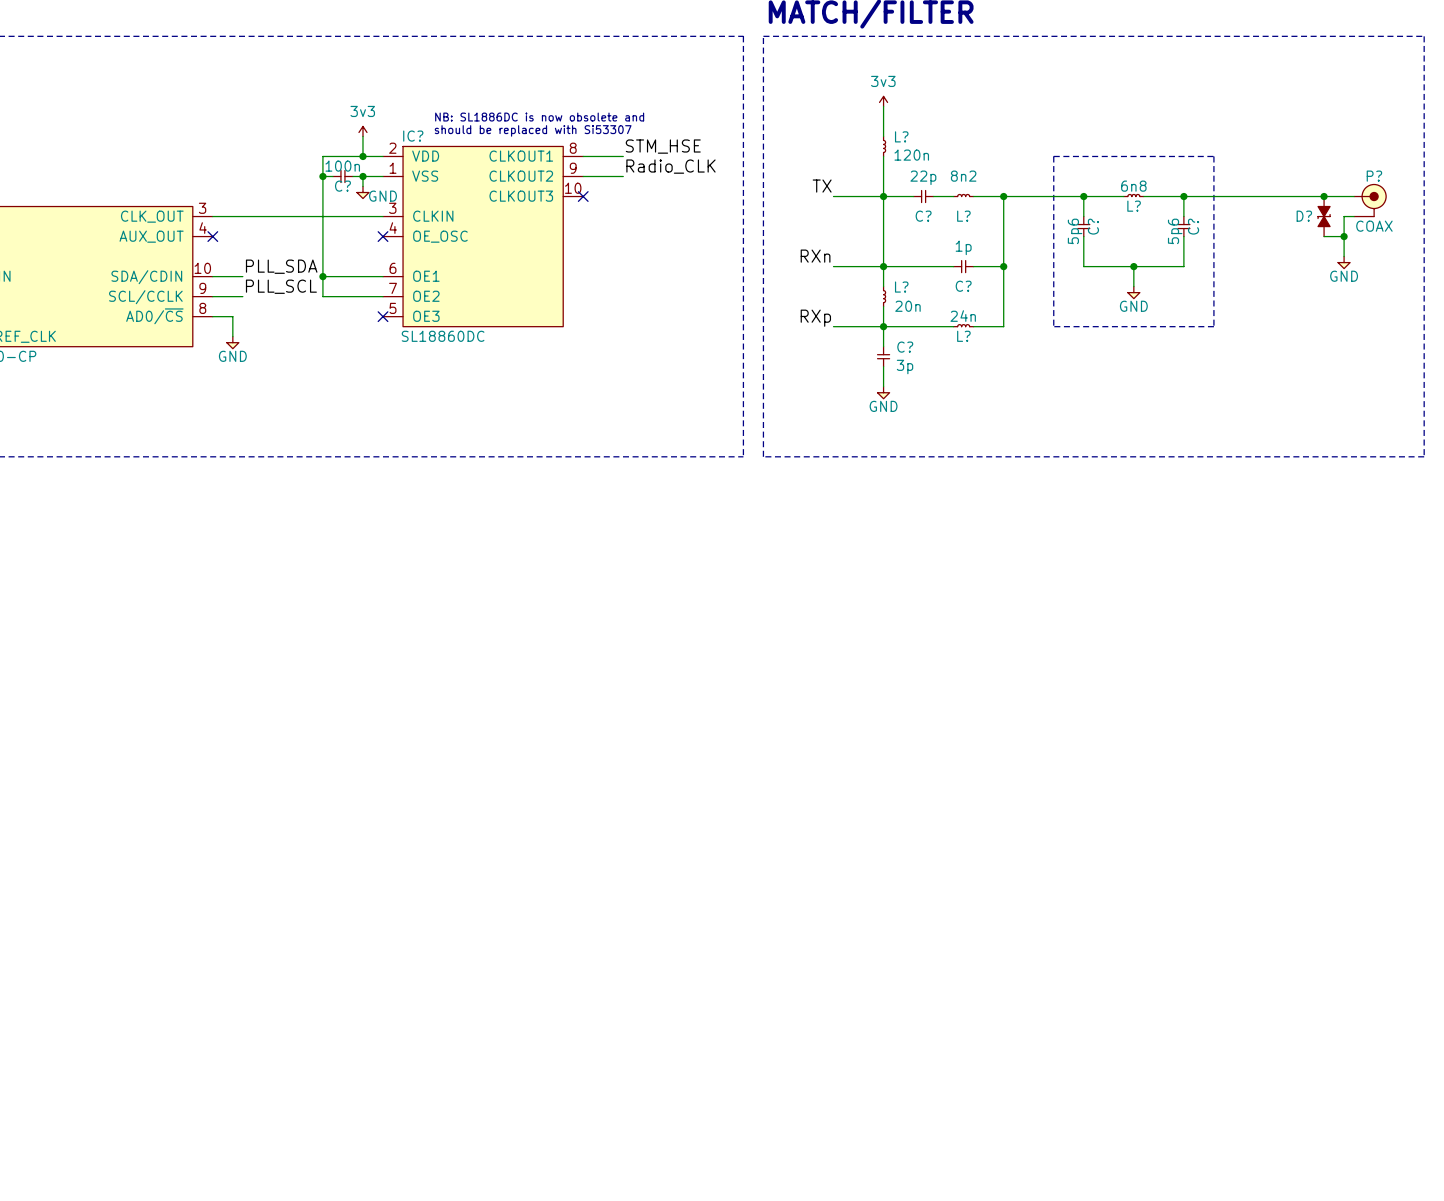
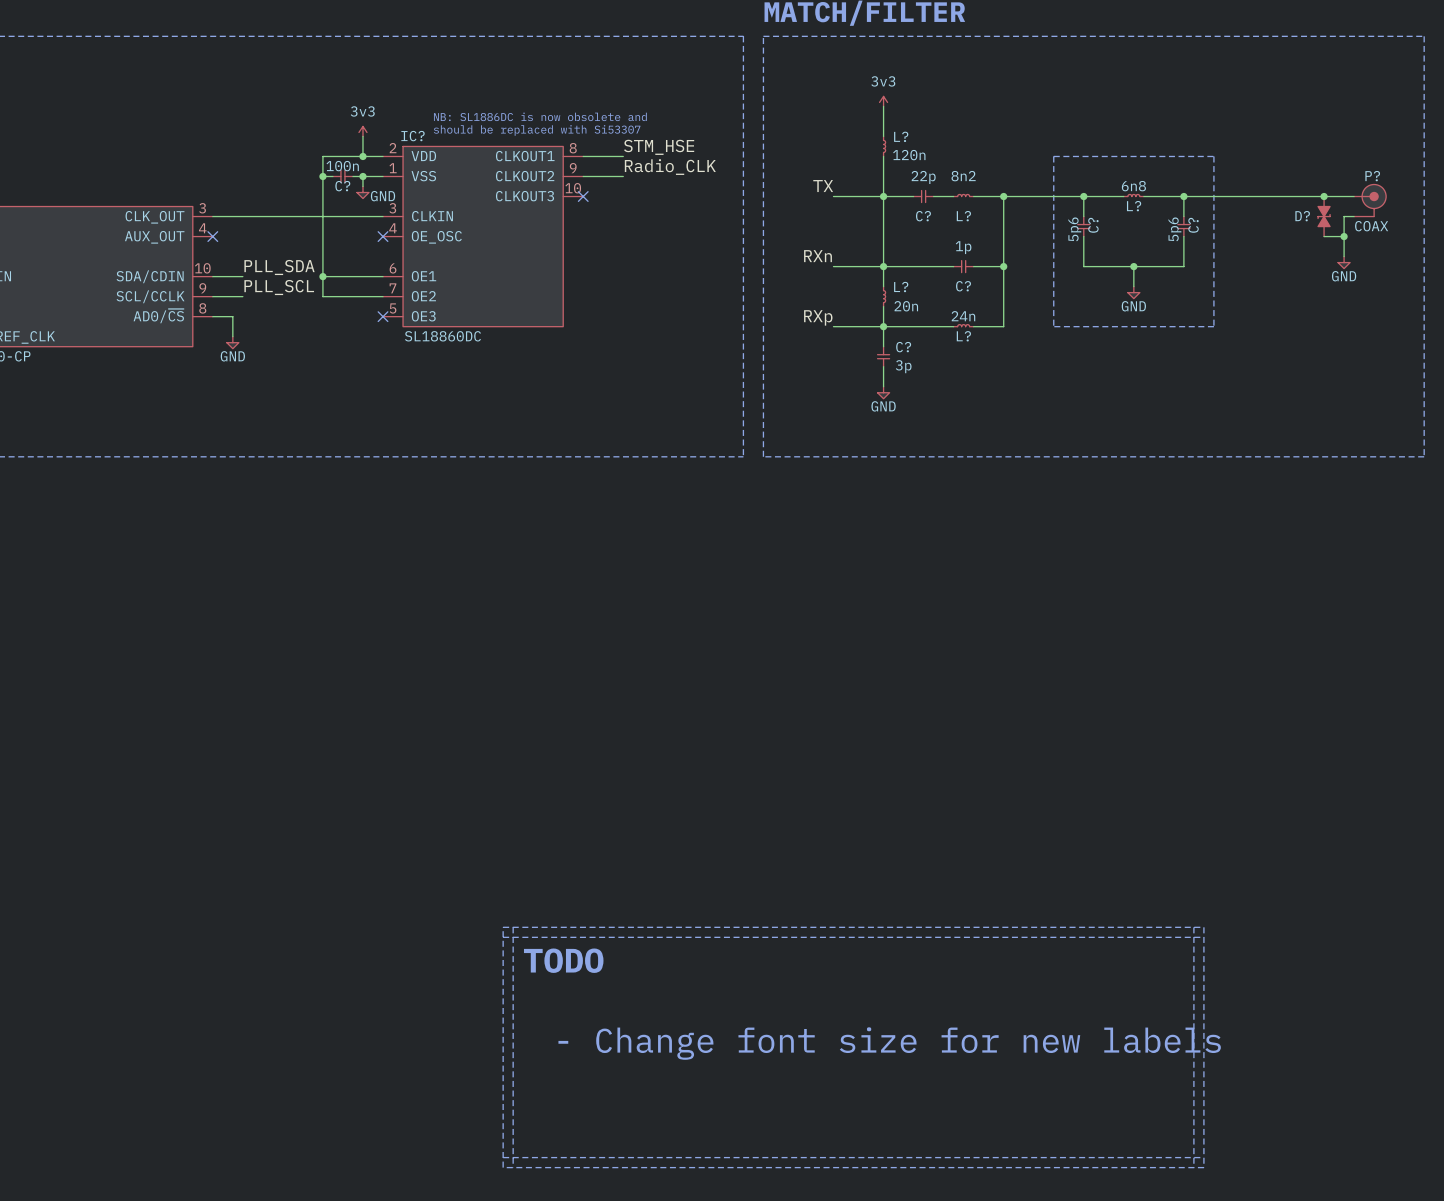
line: none -> (503, 927) (503, 1167) (1203, 1167) (1203, 927) (503, 927)
line: none -> (513, 927) (513, 1167)
line: none -> (1193, 927) (1193, 1167)
line: none -> (503, 937) (1203, 937)
text: none -> TODO (563, 960)
text: none -> - Change font size for new labels (889, 1043)
line: none -> (503, 1157) (1203, 1157)

